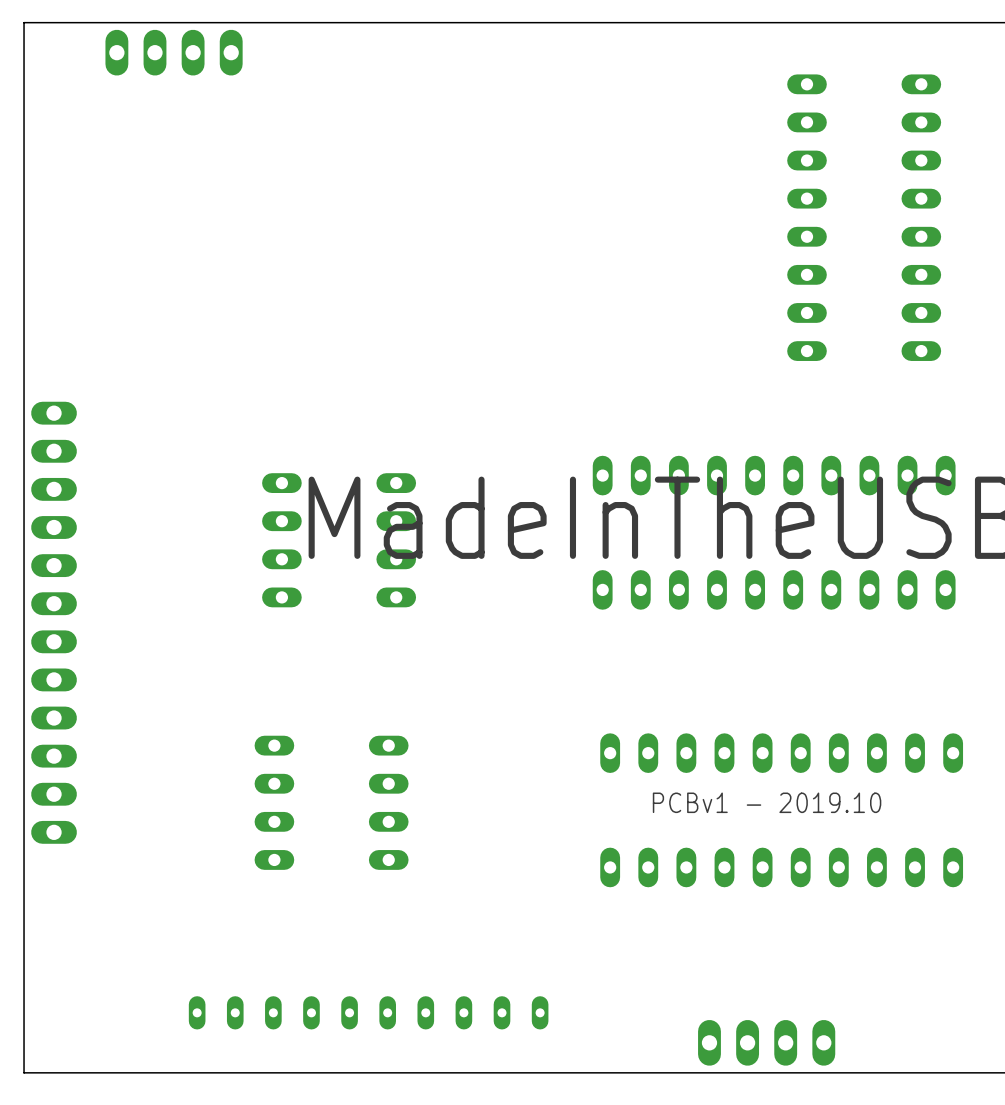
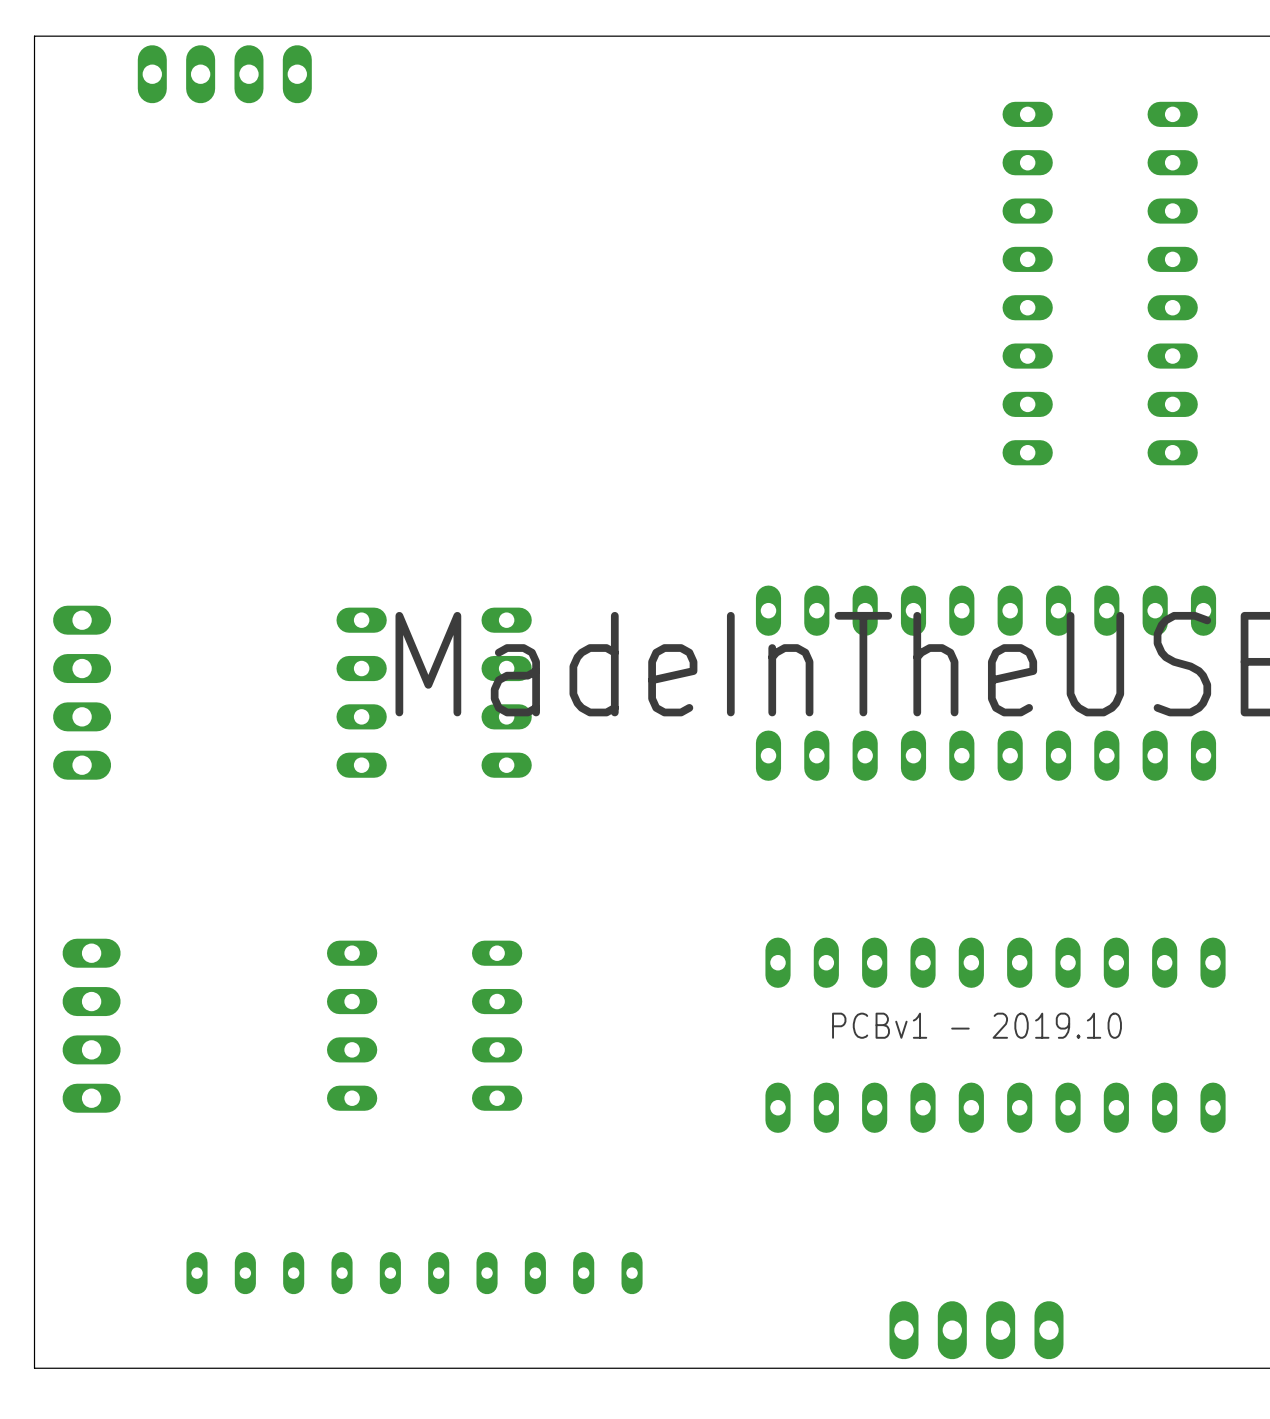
part: none -> (82, 692)
part: (54, 622) -> none
part: none -> (91, 1025)
part position: (368, 1012) -> (414, 1273)

